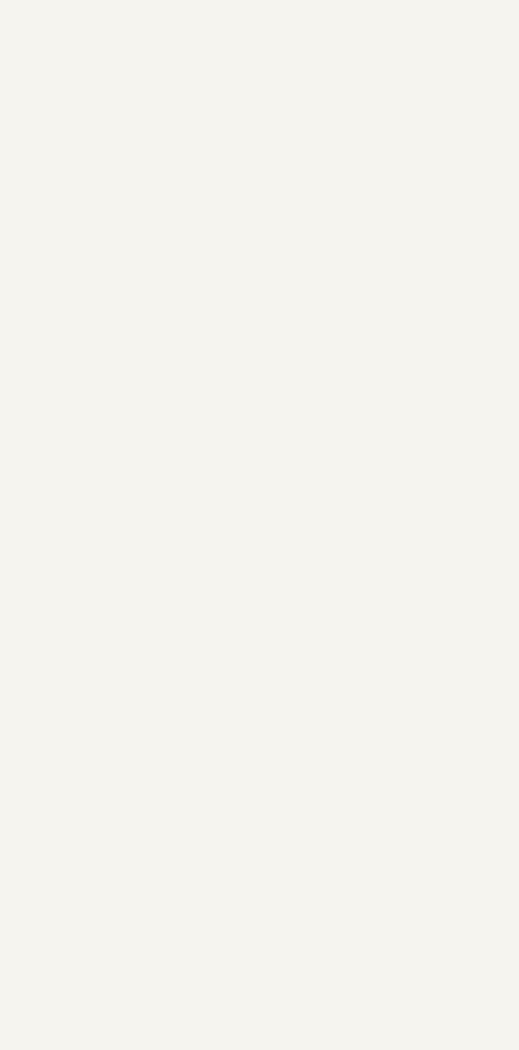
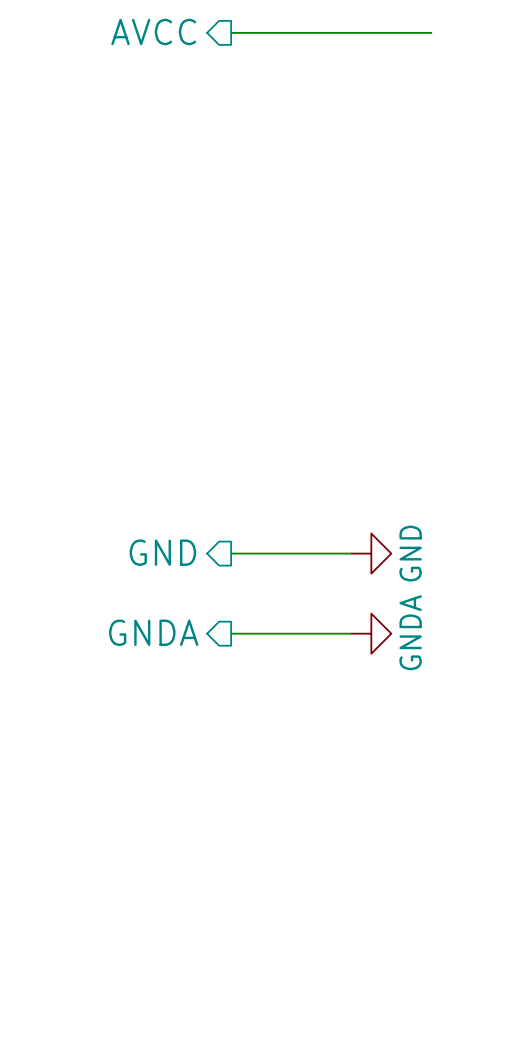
sheet pin: none -> AVCC (153, 31)
wire: none -> (231, 32) (431, 32)
sheet pin: none -> GND (162, 552)
wire: none -> (231, 553) (351, 553)
power symbol: none -> GND (371, 553)
sheet pin: none -> GNDA (153, 632)
wire: none -> (231, 633) (351, 633)
power symbol: none -> GNDA (371, 633)

